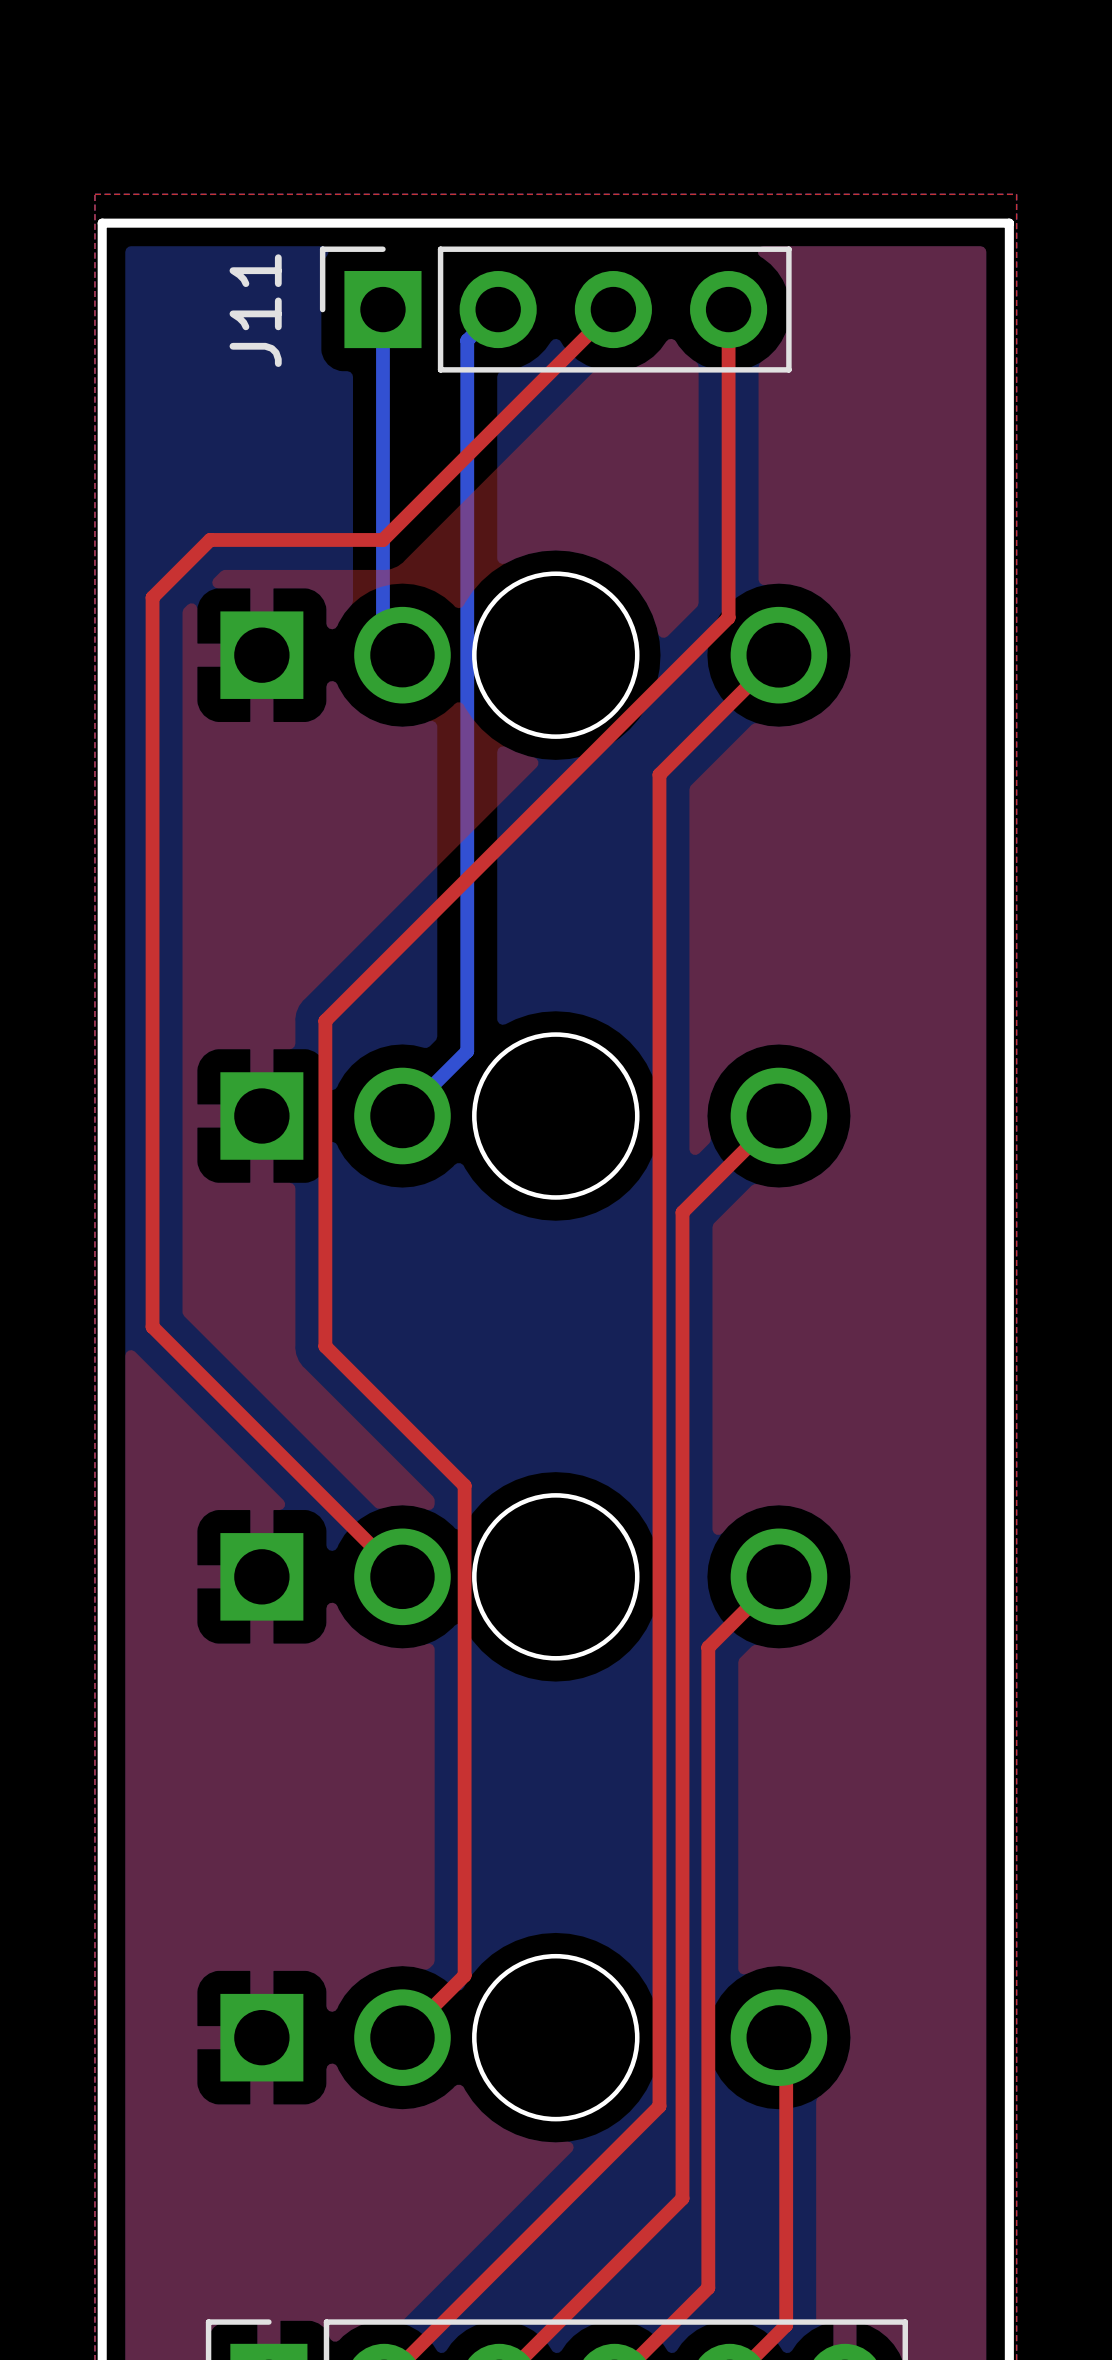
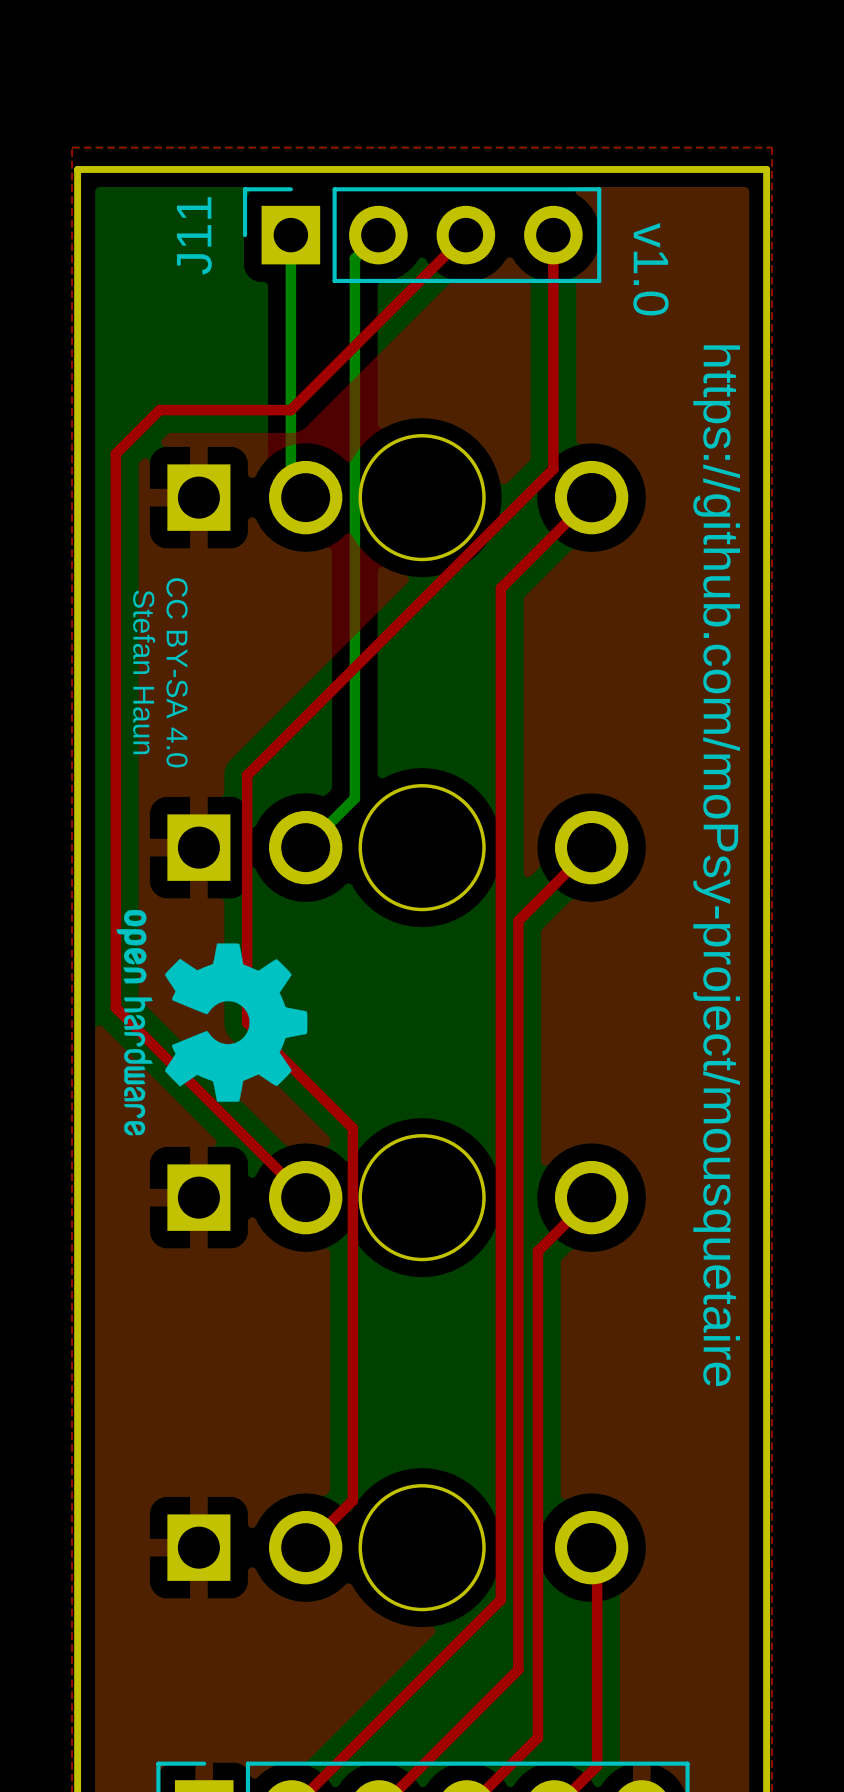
text: none -> v1.0 (650, 269)
text: none -> Stefan Haun (144, 672)
text: none -> CC BY-SA 4.0 (177, 672)
text: none -> https://github.com/moPsy-project/mousquetaire (716, 865)
drawing: none -> [116, 909, 308, 1136]

